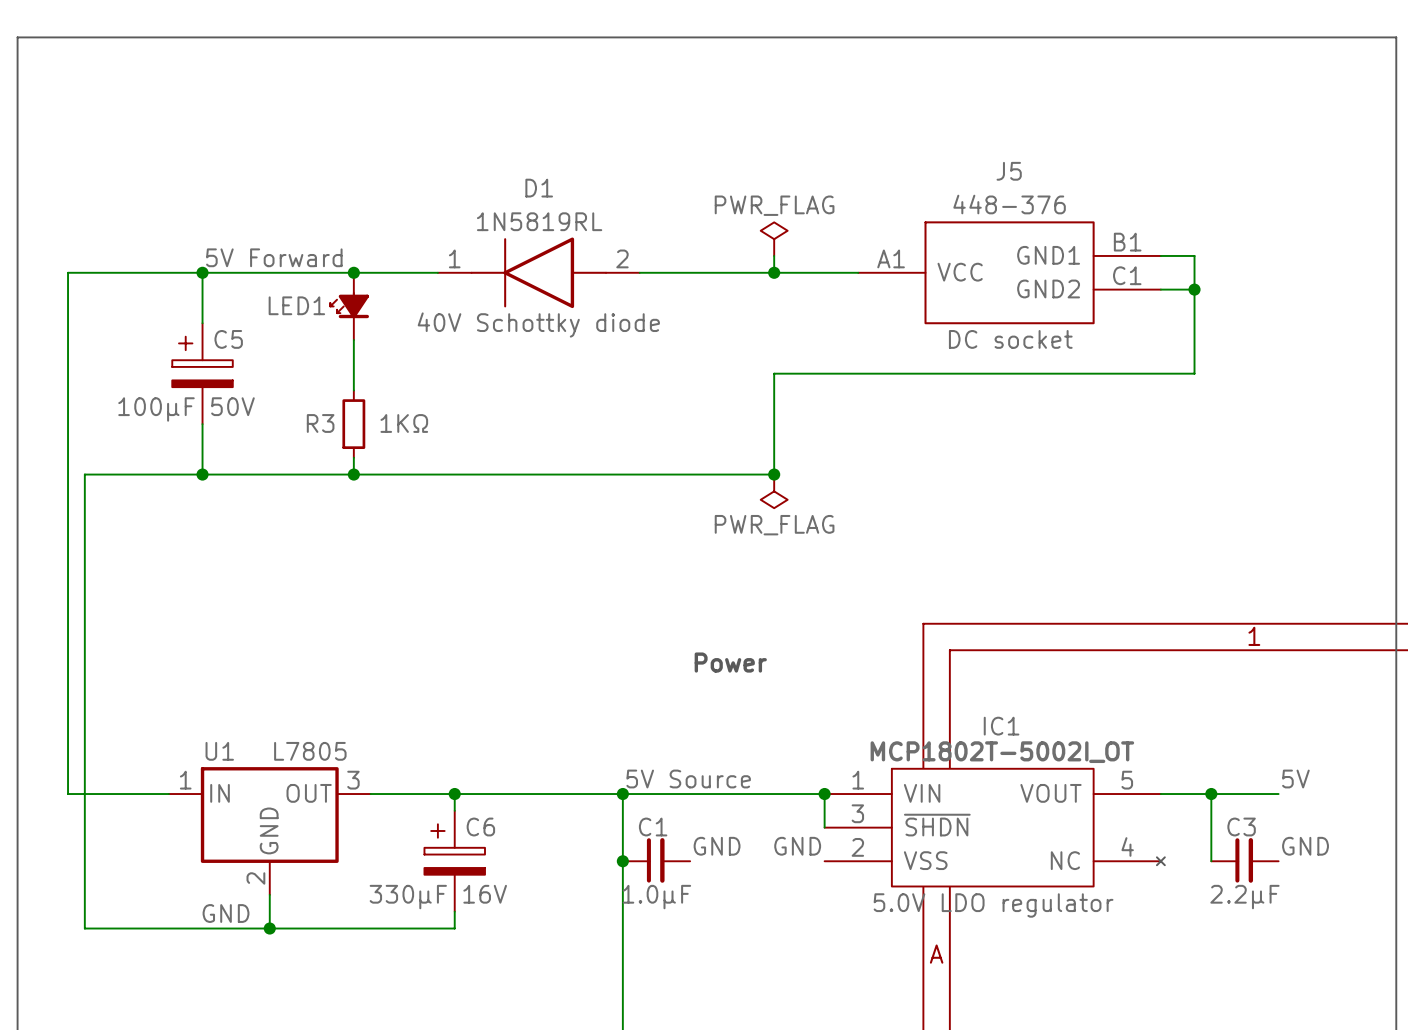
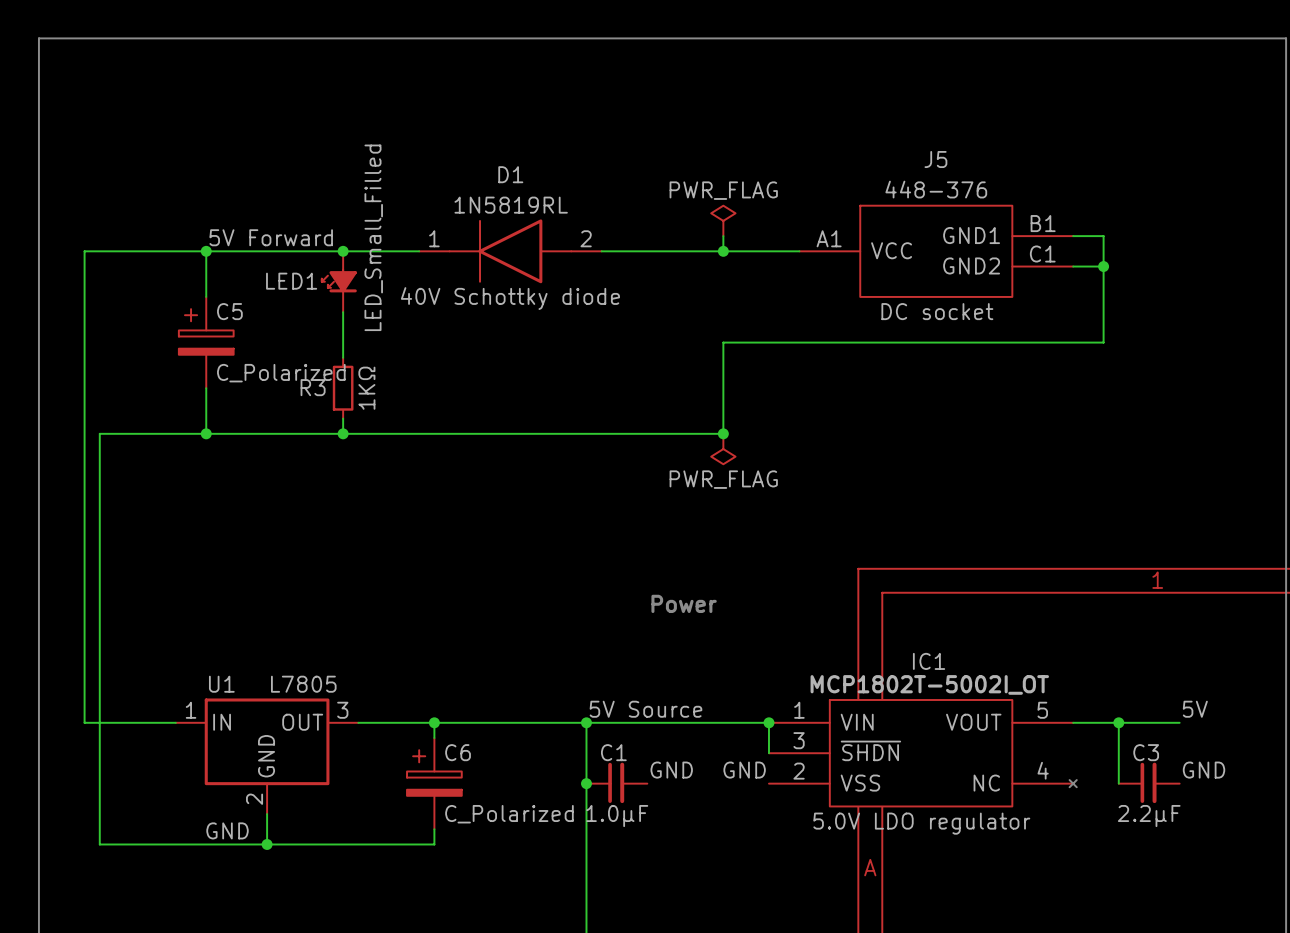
LED1 value: none -> LED_Small_Filled (373, 237)
C5 value: none -> C_Polarized (281, 373)
C5 text: 100μF 50V (186, 409) -> none
R3 text rotation: 0° (404, 423) -> 90° counterclockwise (366, 388)
C6 value: none -> C_Polarized (509, 814)
C6 text: 330μF 16V (438, 897) -> none

